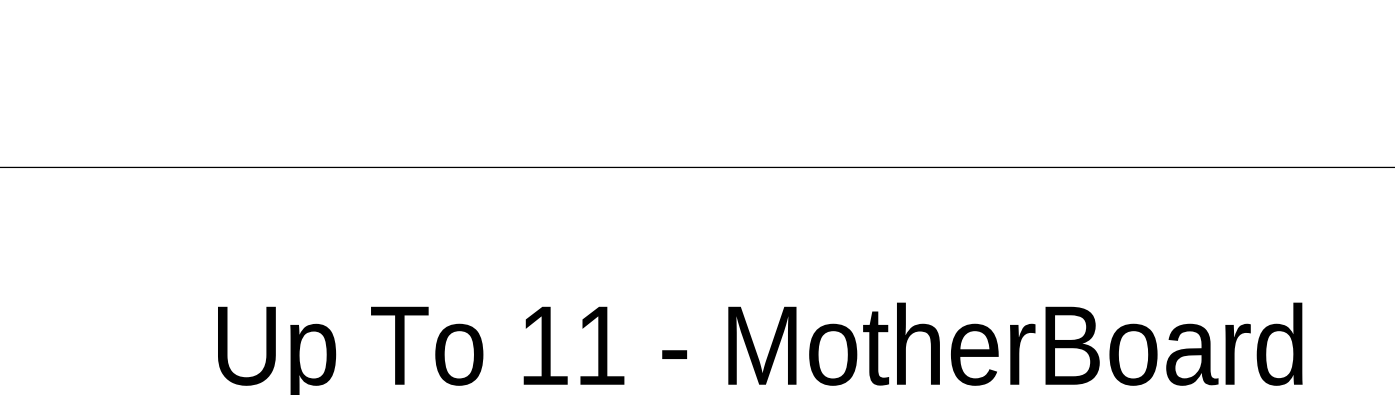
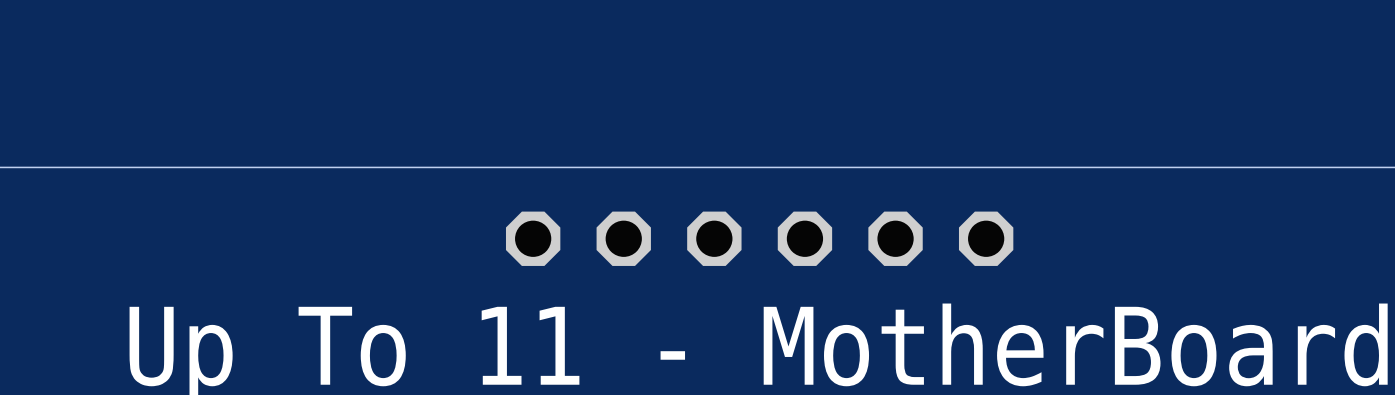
part: none -> (759, 238)

